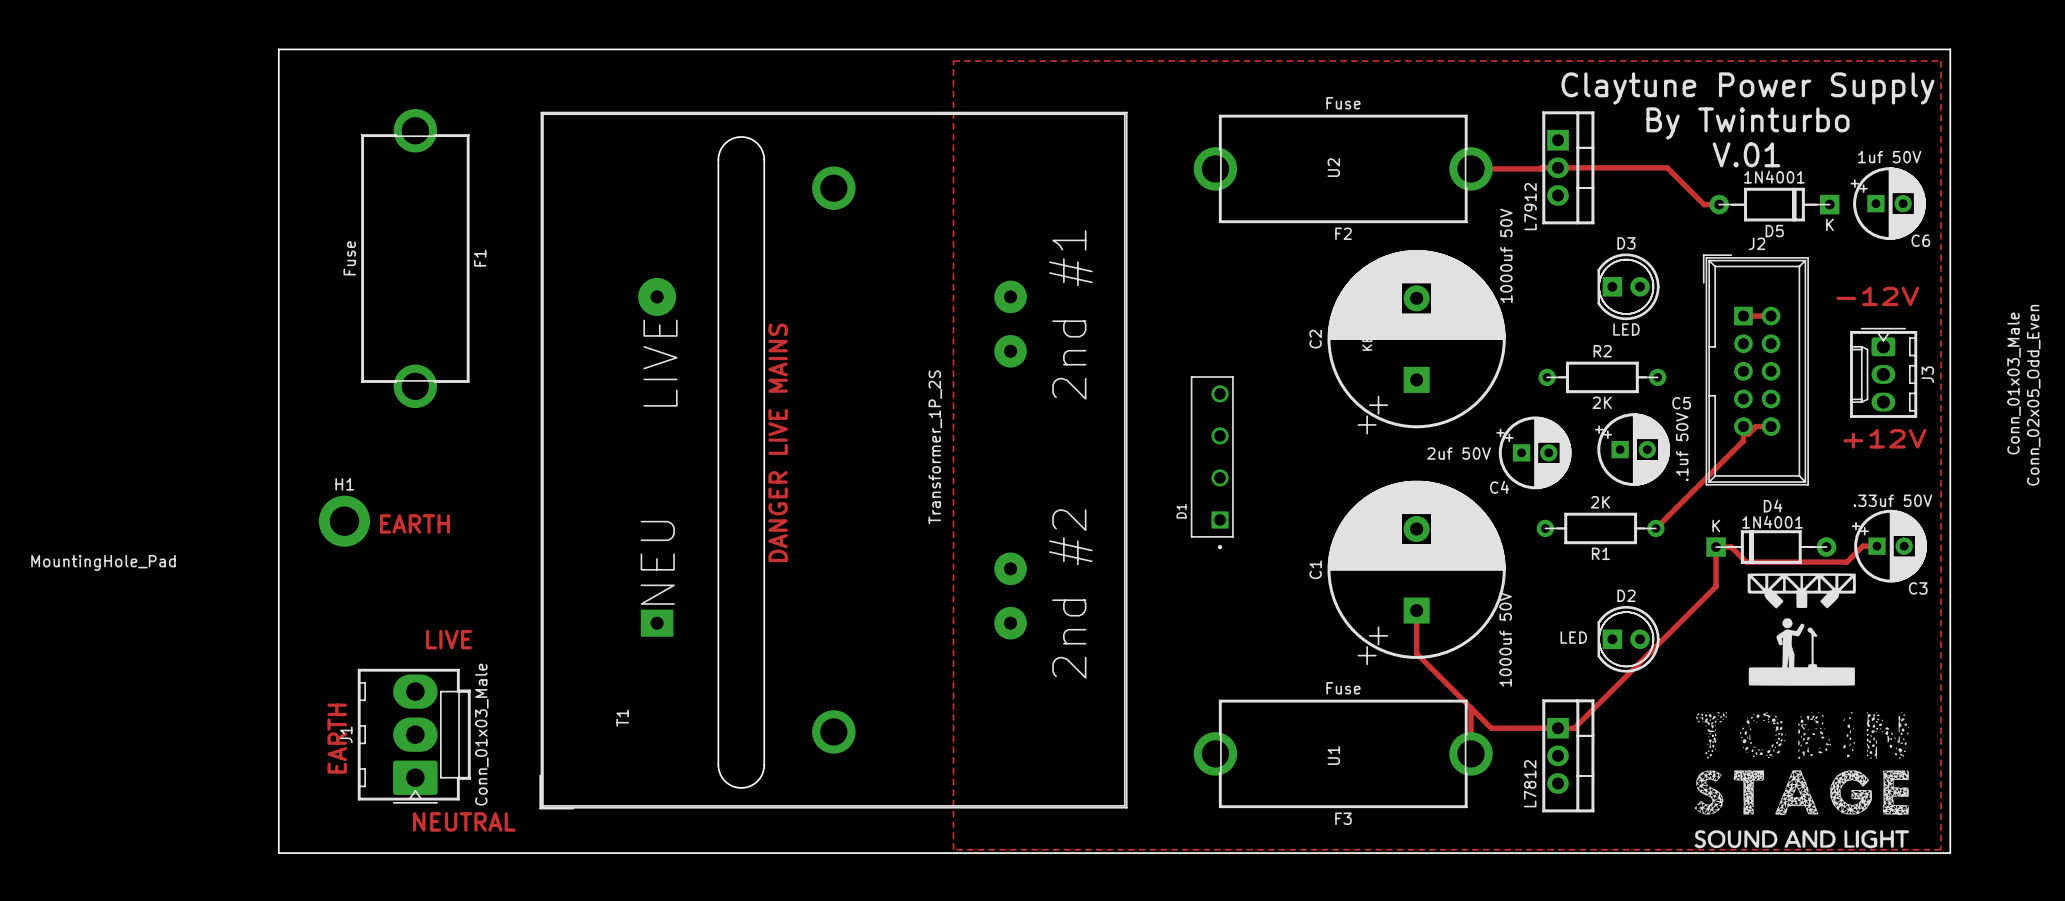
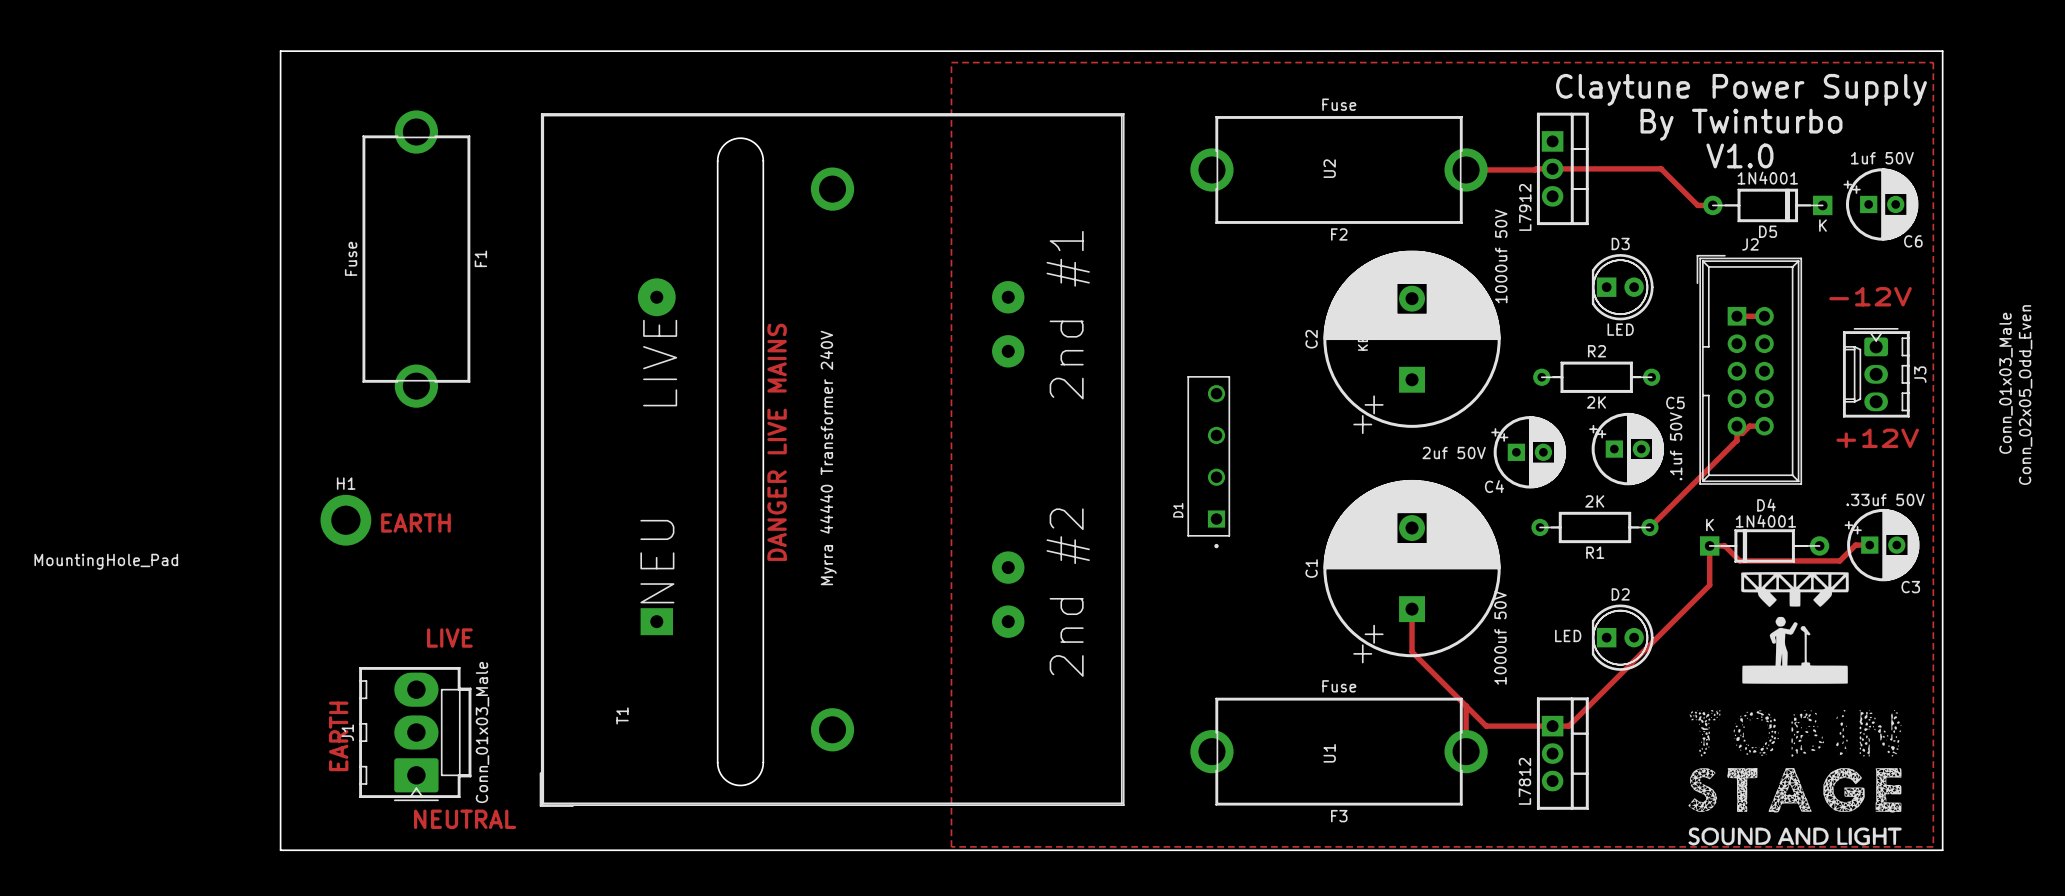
text: V.01 (1746, 154) -> V1.0 (1739, 155)
T1 value: Transformer_1P_2S (935, 447) -> Myrra 44440 Transformer 240V (828, 457)

